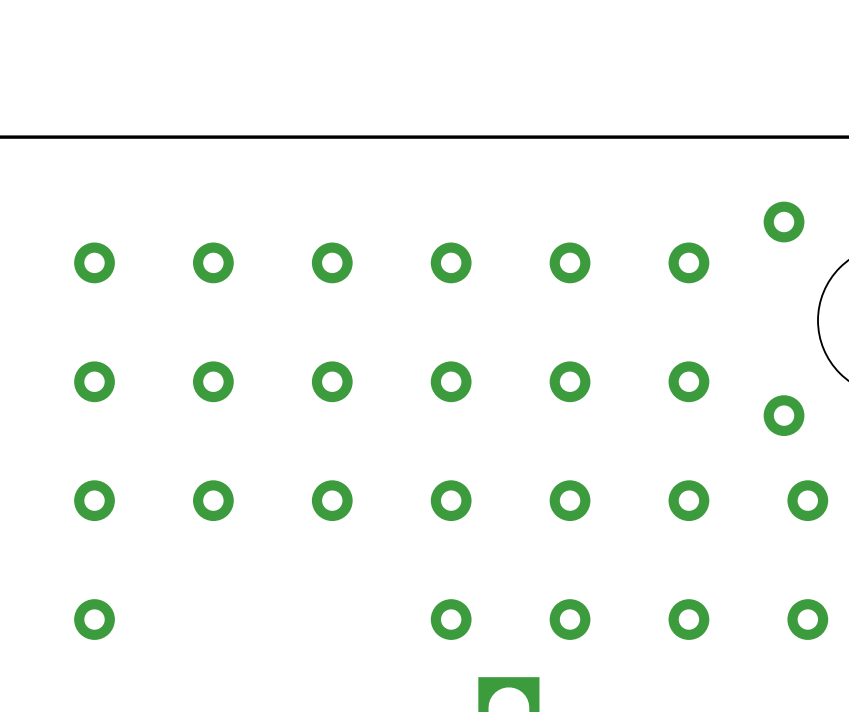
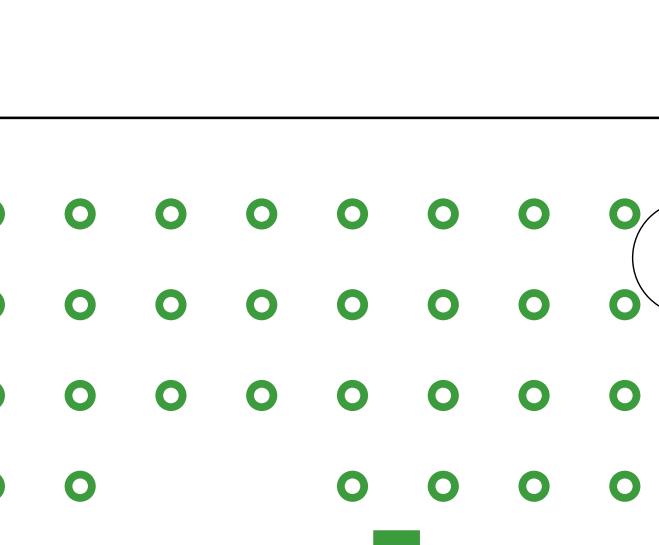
via position: (784, 222) -> (624, 213)
via position: (784, 415) -> (624, 304)

